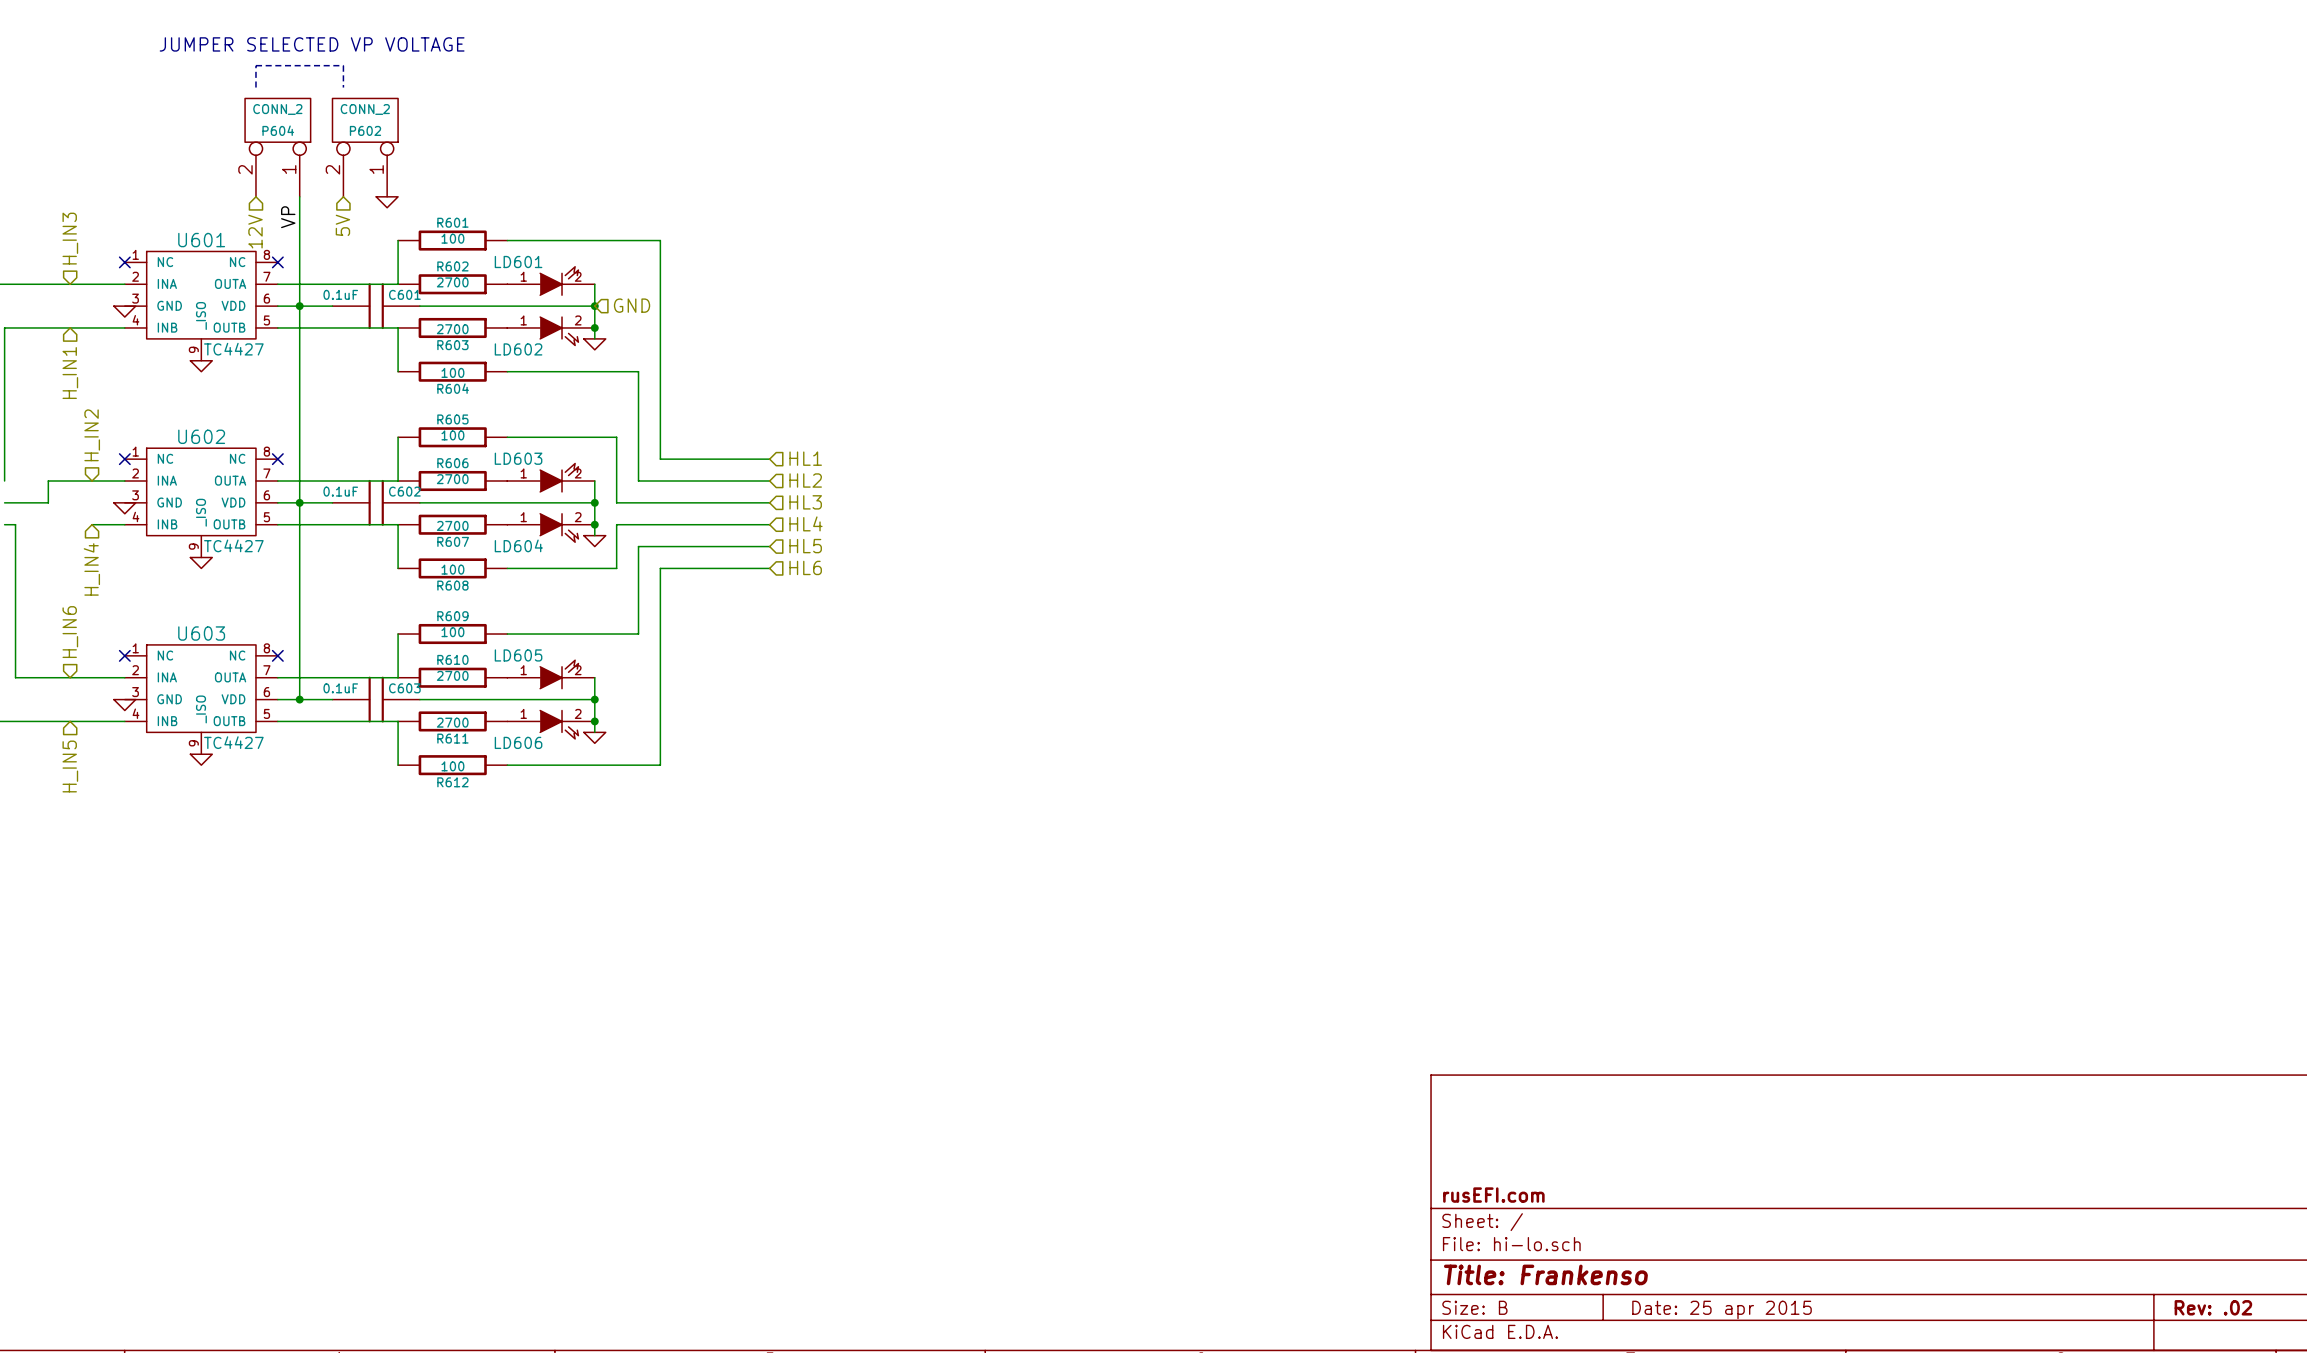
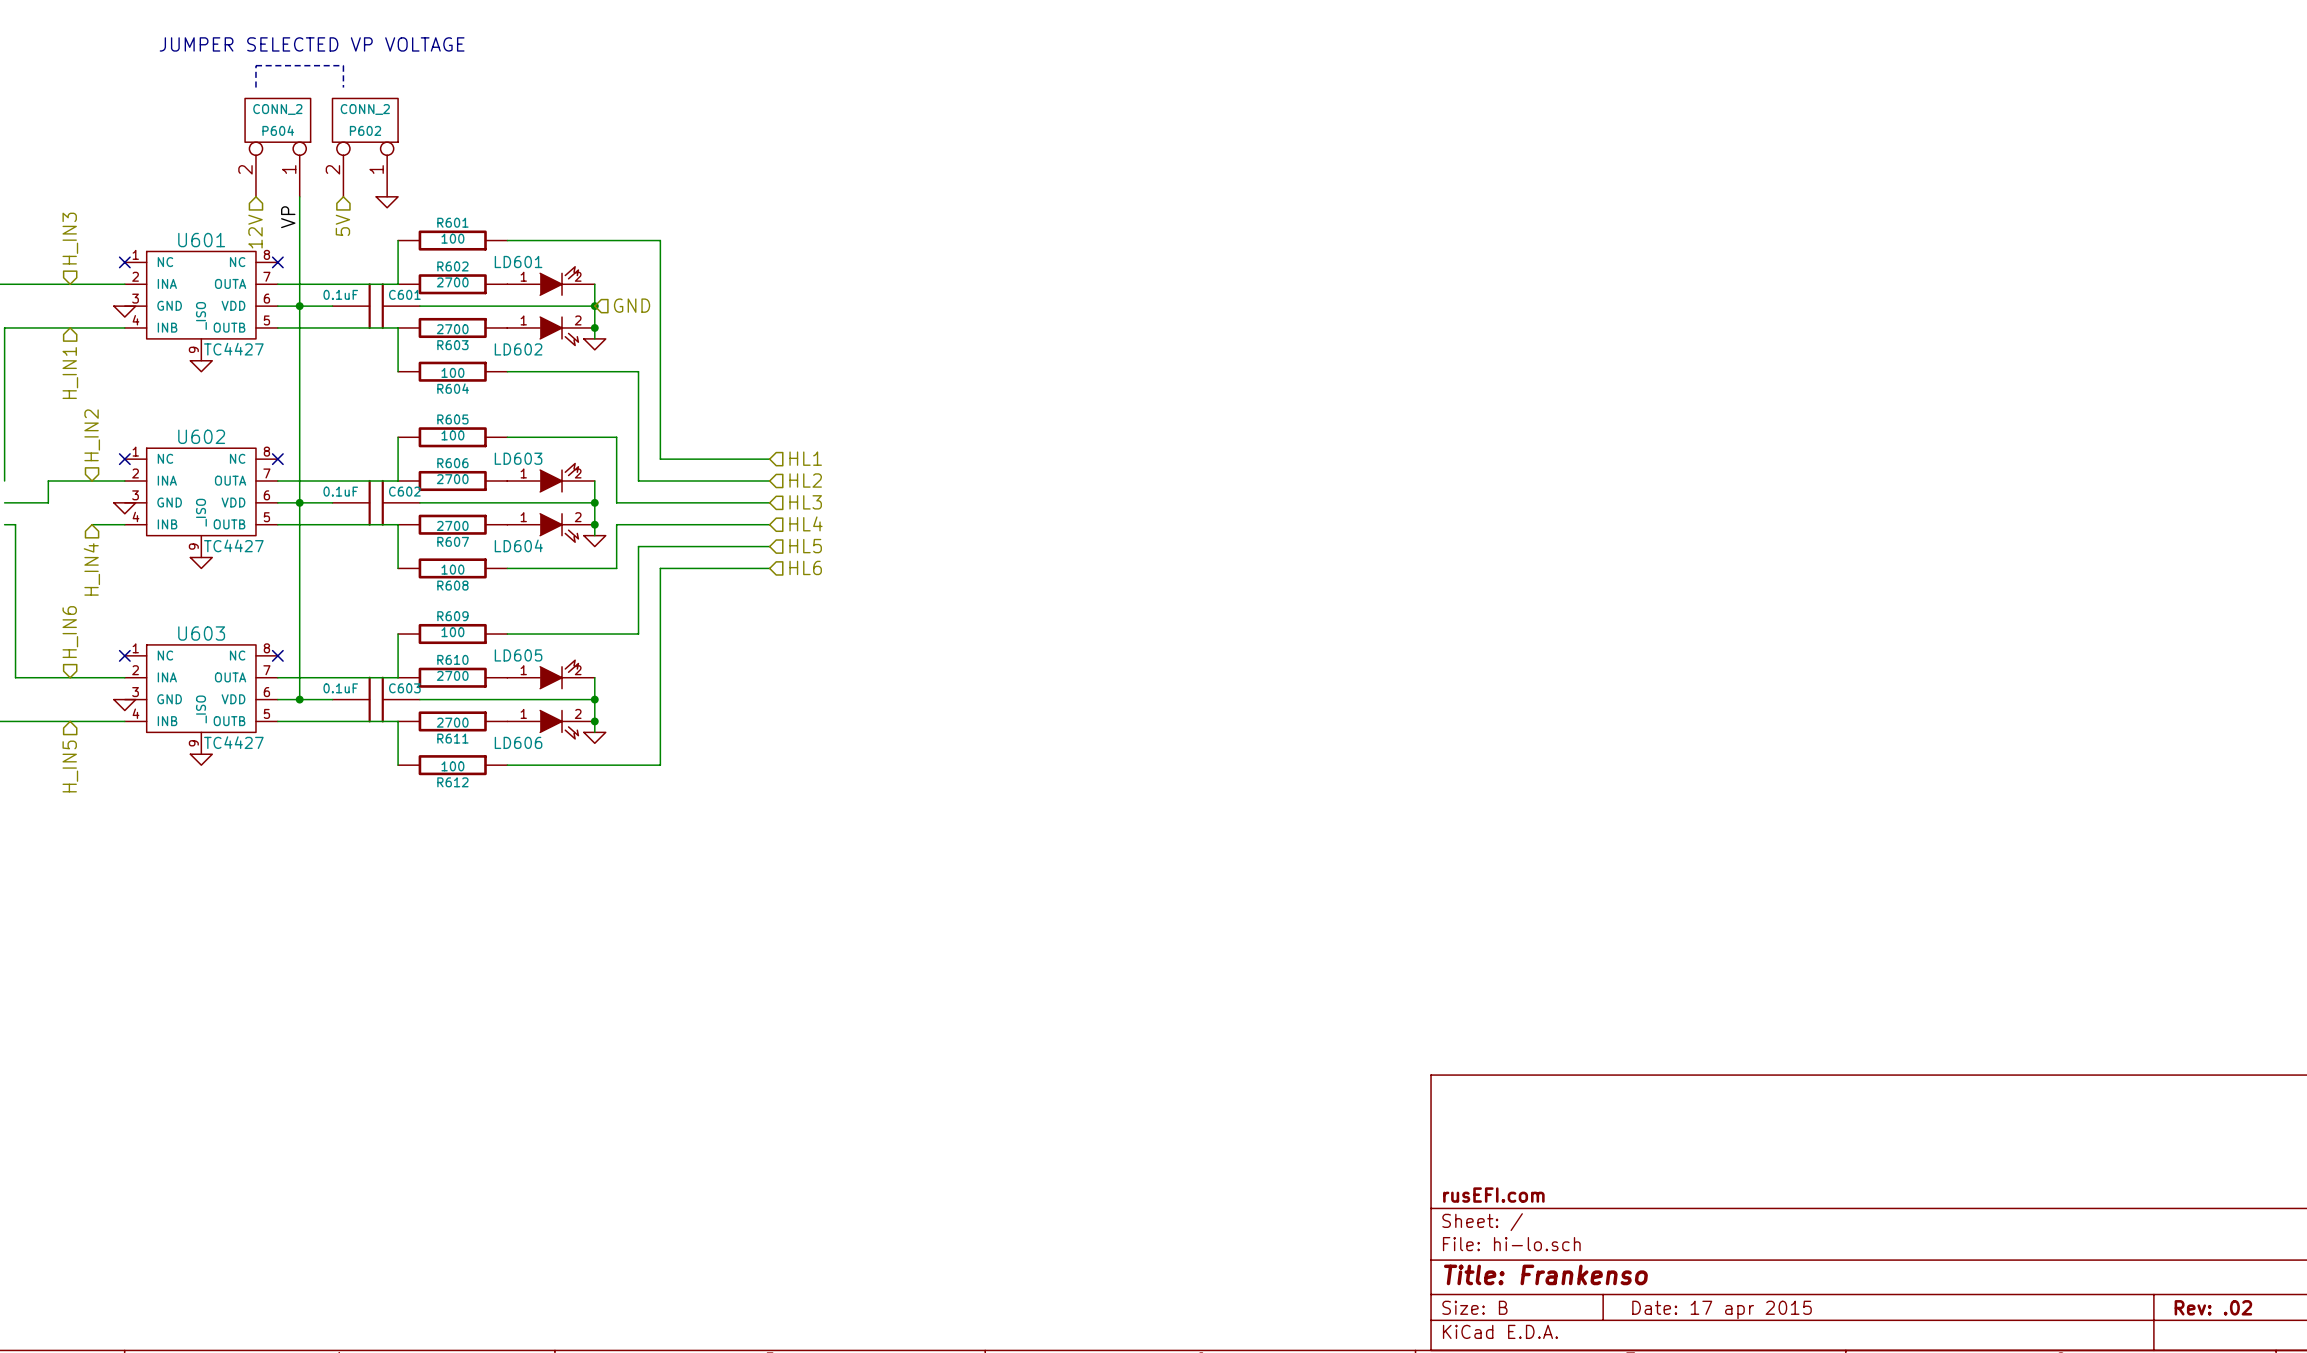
title block: Date: 25 apr 2015 (1722, 1309) -> Date: 17 apr 2015 (1722, 1309)

